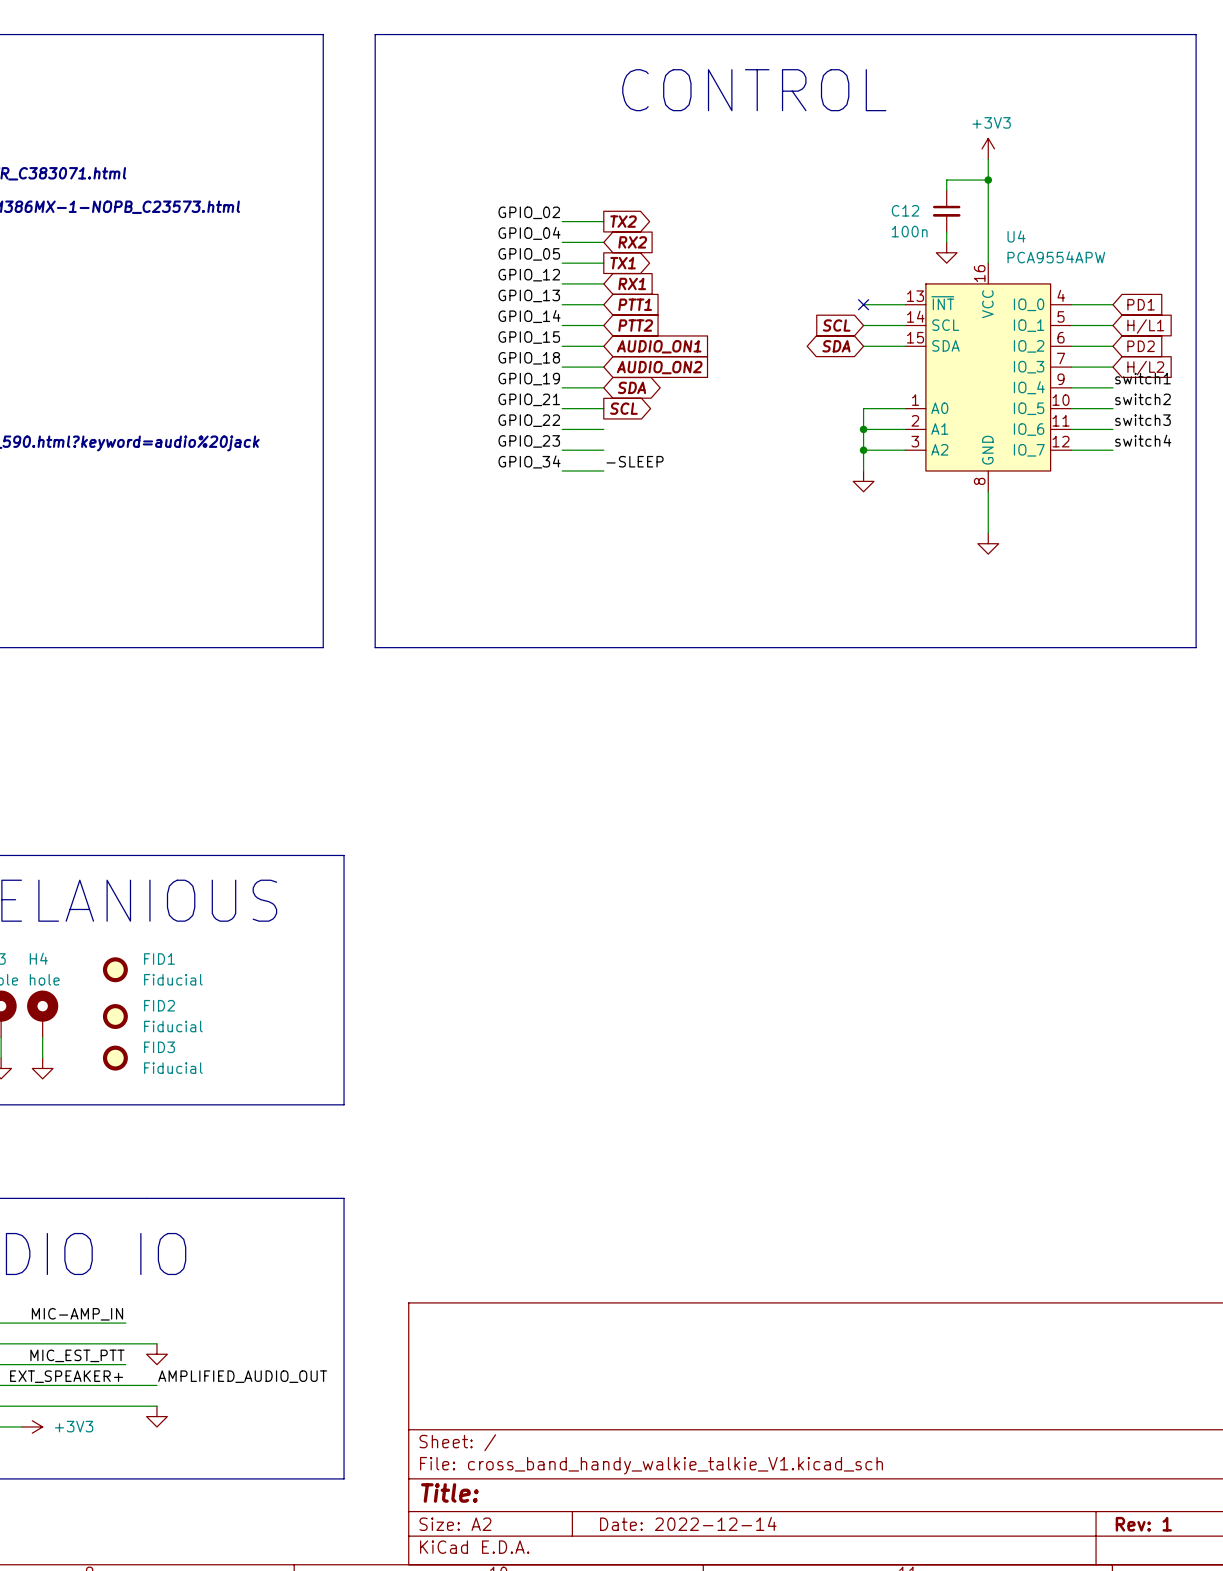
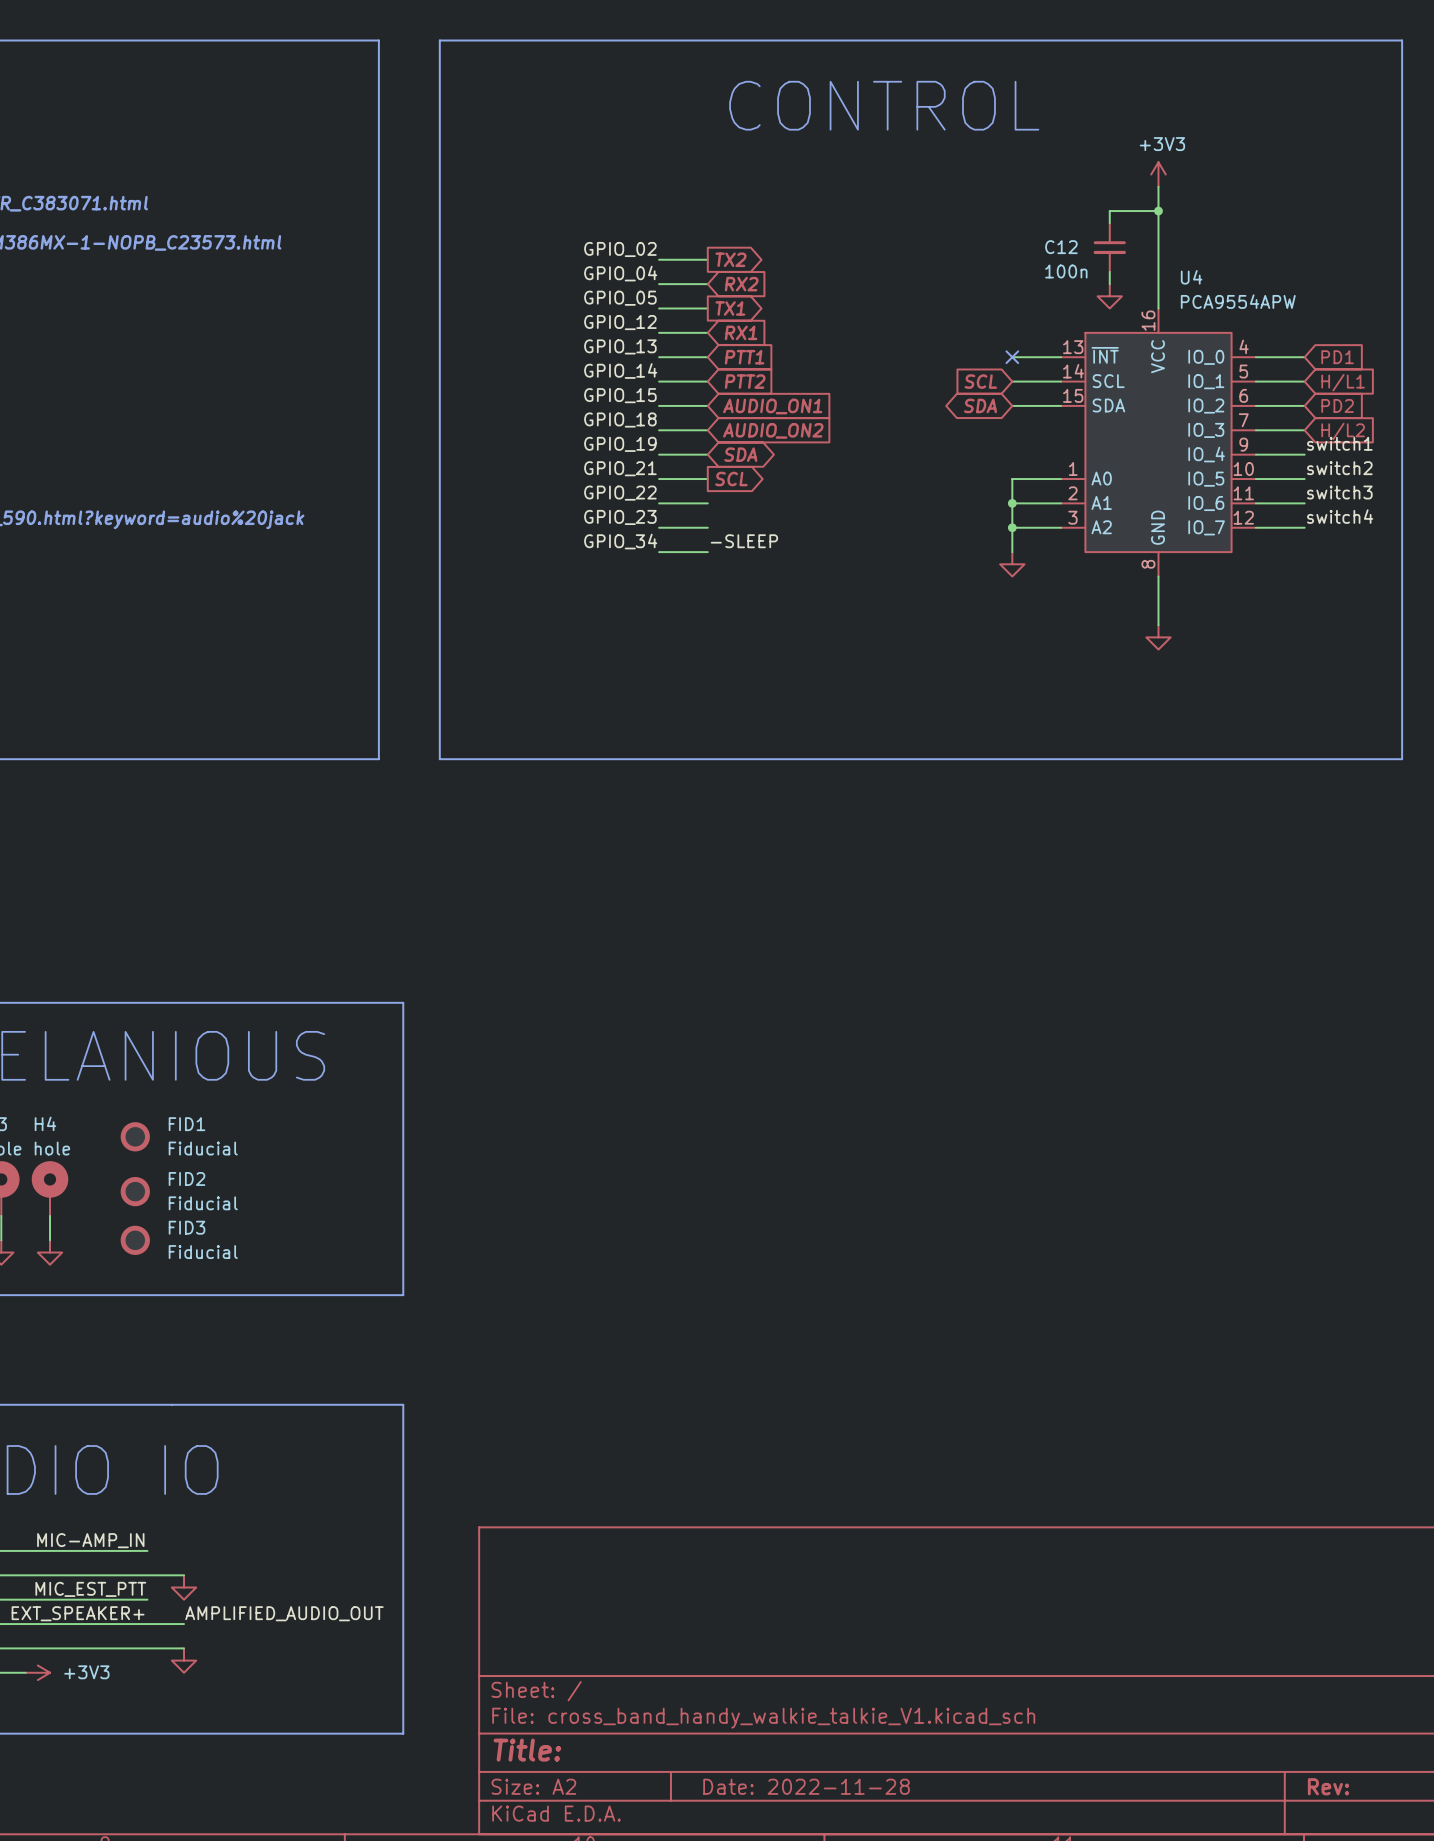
title block: Date: 2022-12-14 (688, 1523) -> Date: 2022-11-28 (806, 1786)
title block: Rev: 1 (1143, 1524) -> Rev: (1328, 1786)

